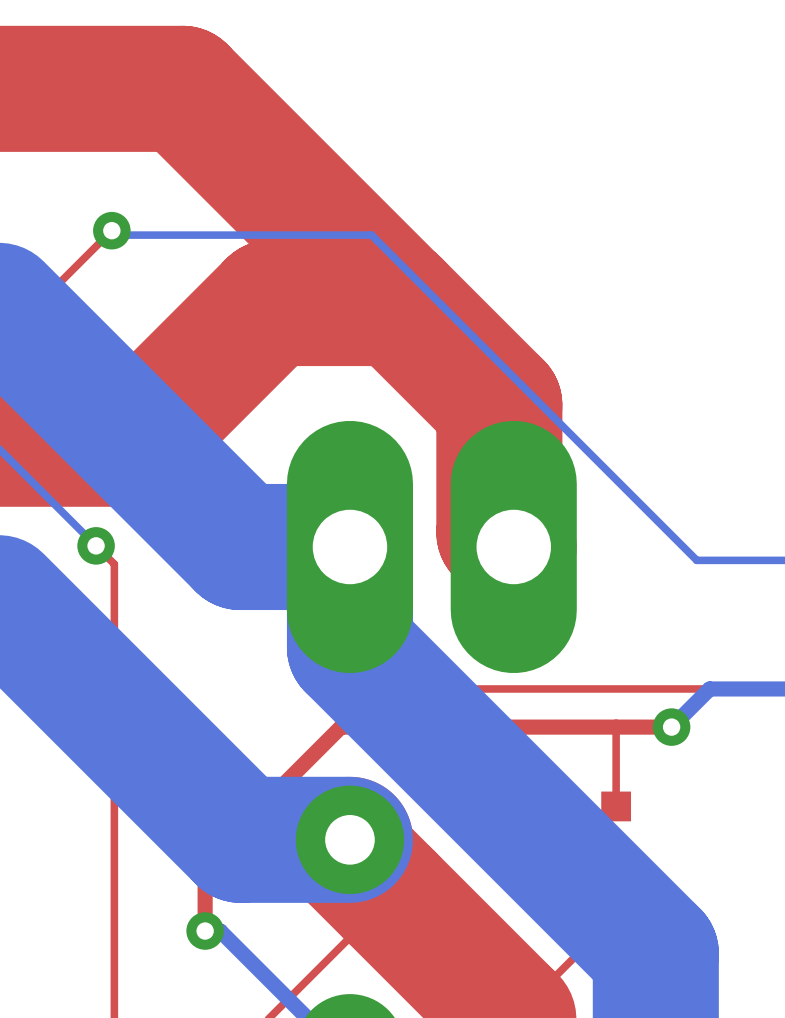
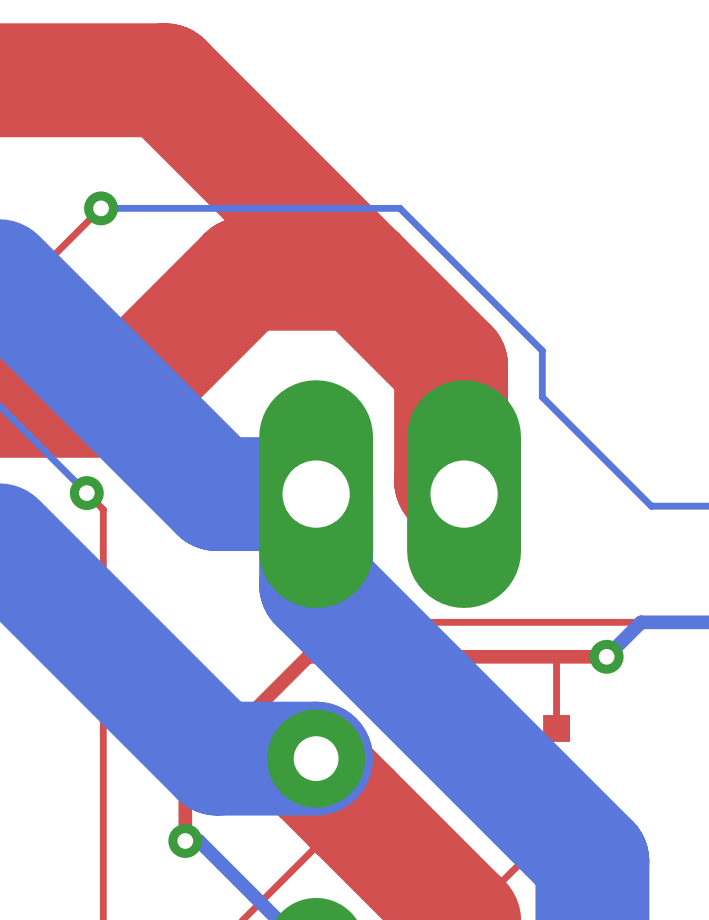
bottom track: (111, 230) (114, 235) (371, 235) (696, 560) (721, 560) -> (101, 208) (399, 208) (542, 350) (542, 397) (651, 506)

